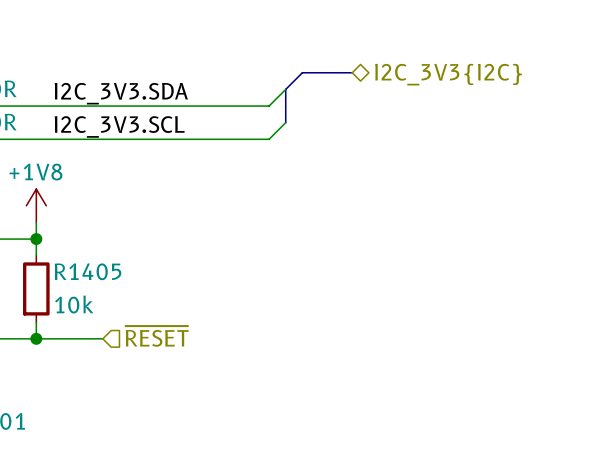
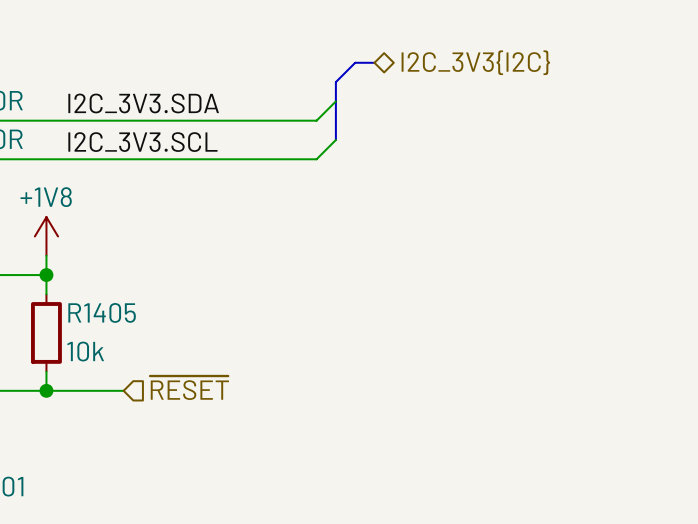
bus: (352, 72) (302, 72) (285, 89) -> (374, 62) (355, 62) (335, 82) (335, 101)
hierarchical label position: I2C_3V3{I2C} (448, 74) -> I2C_3V3{I2C} (475, 62)

